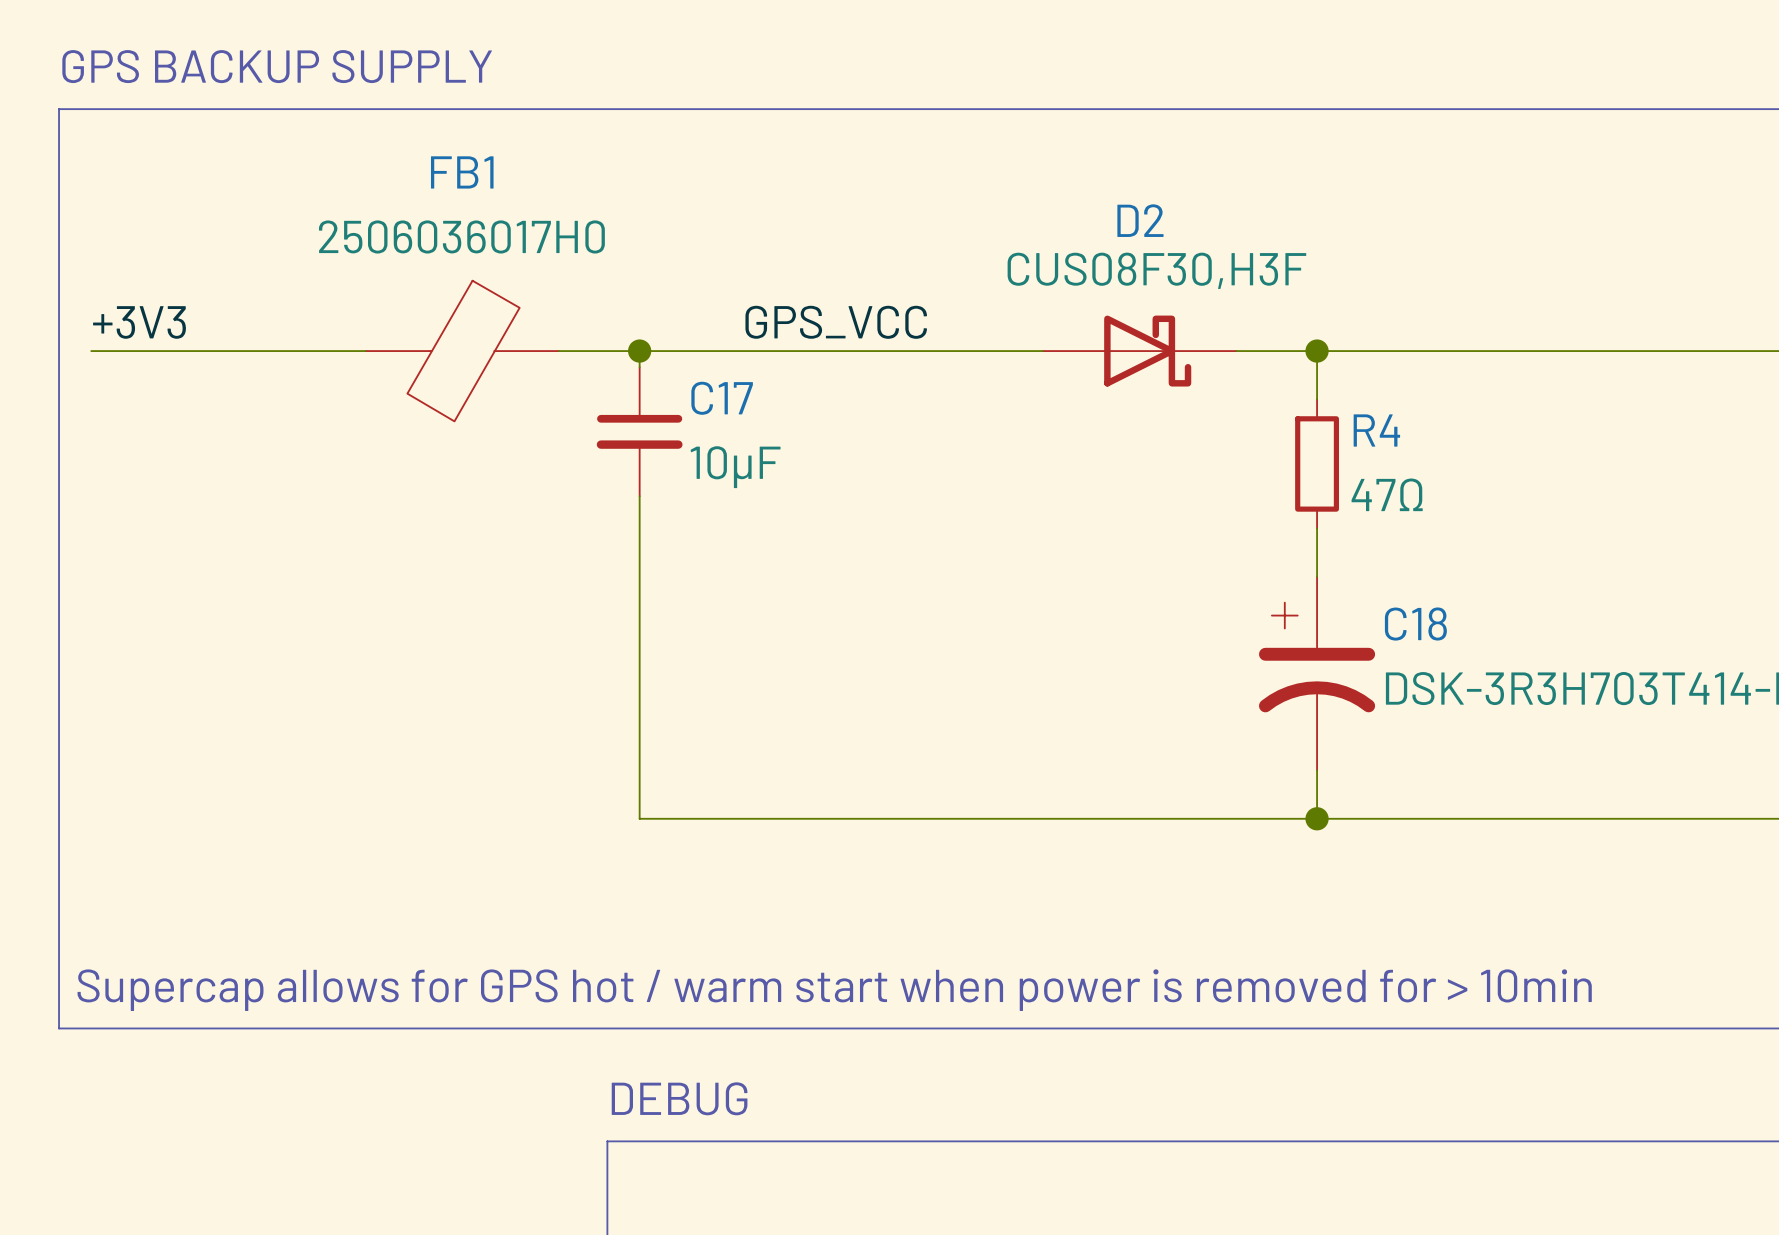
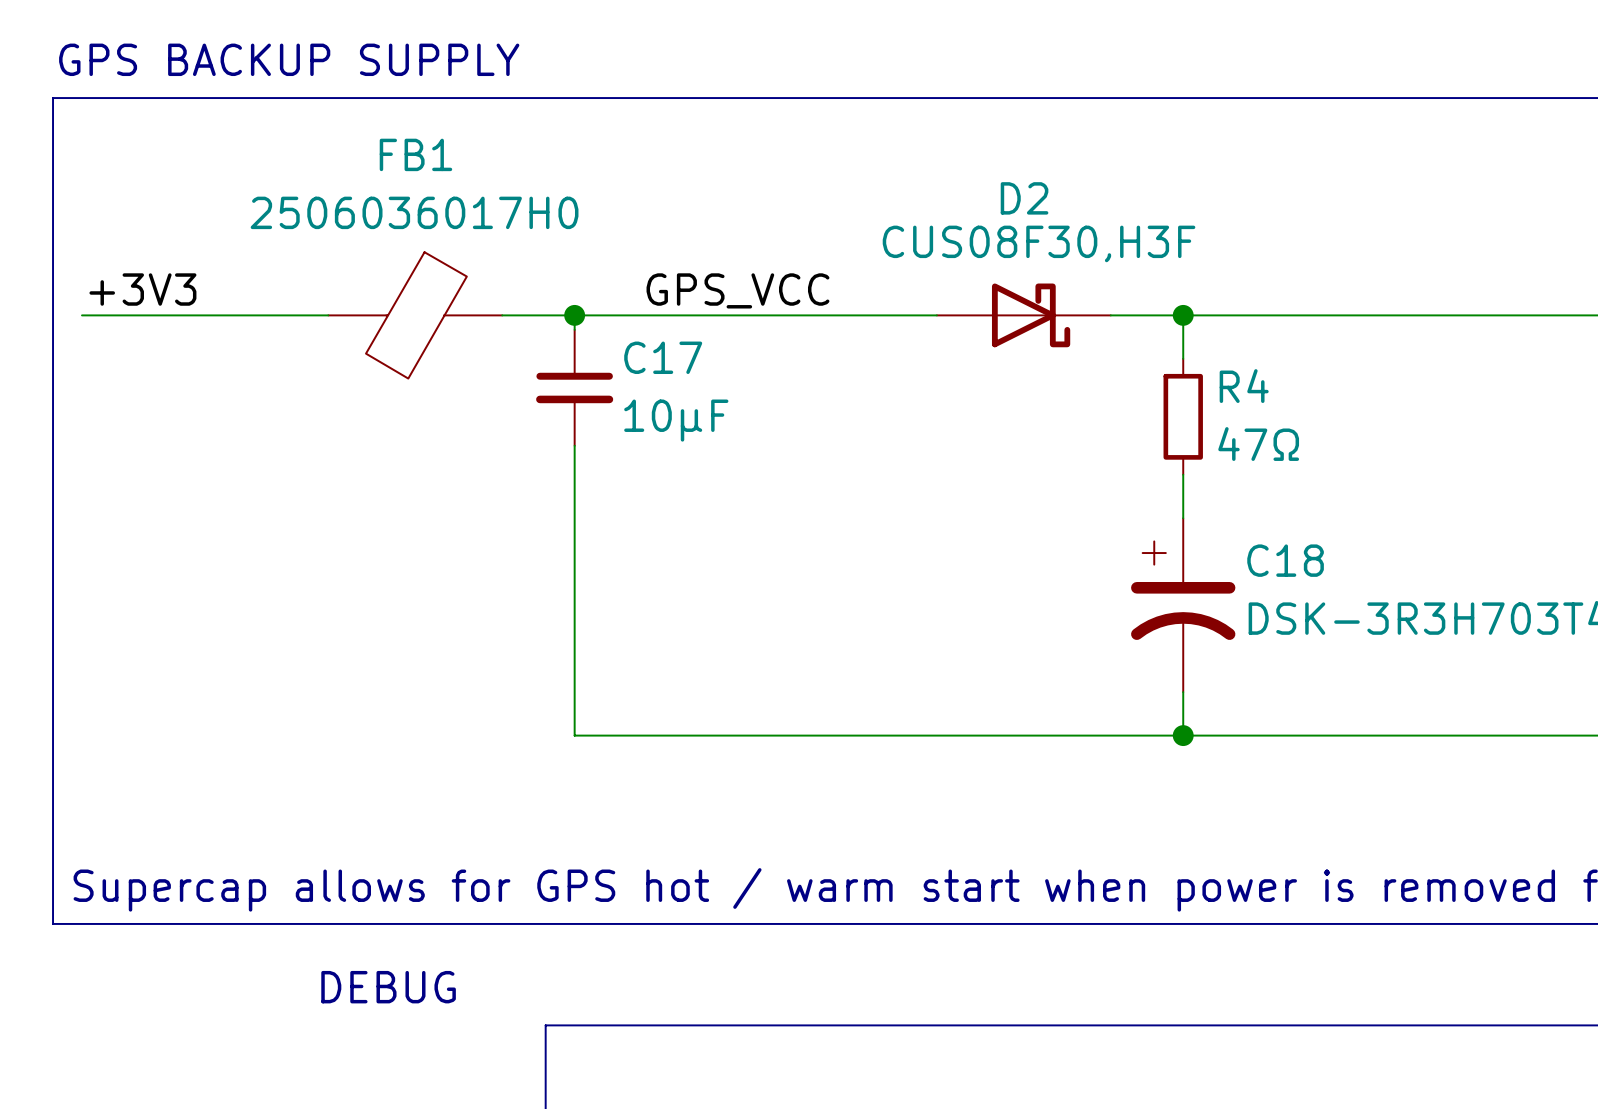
text position: DEBUG (679, 1098) -> DEBUG (388, 987)

